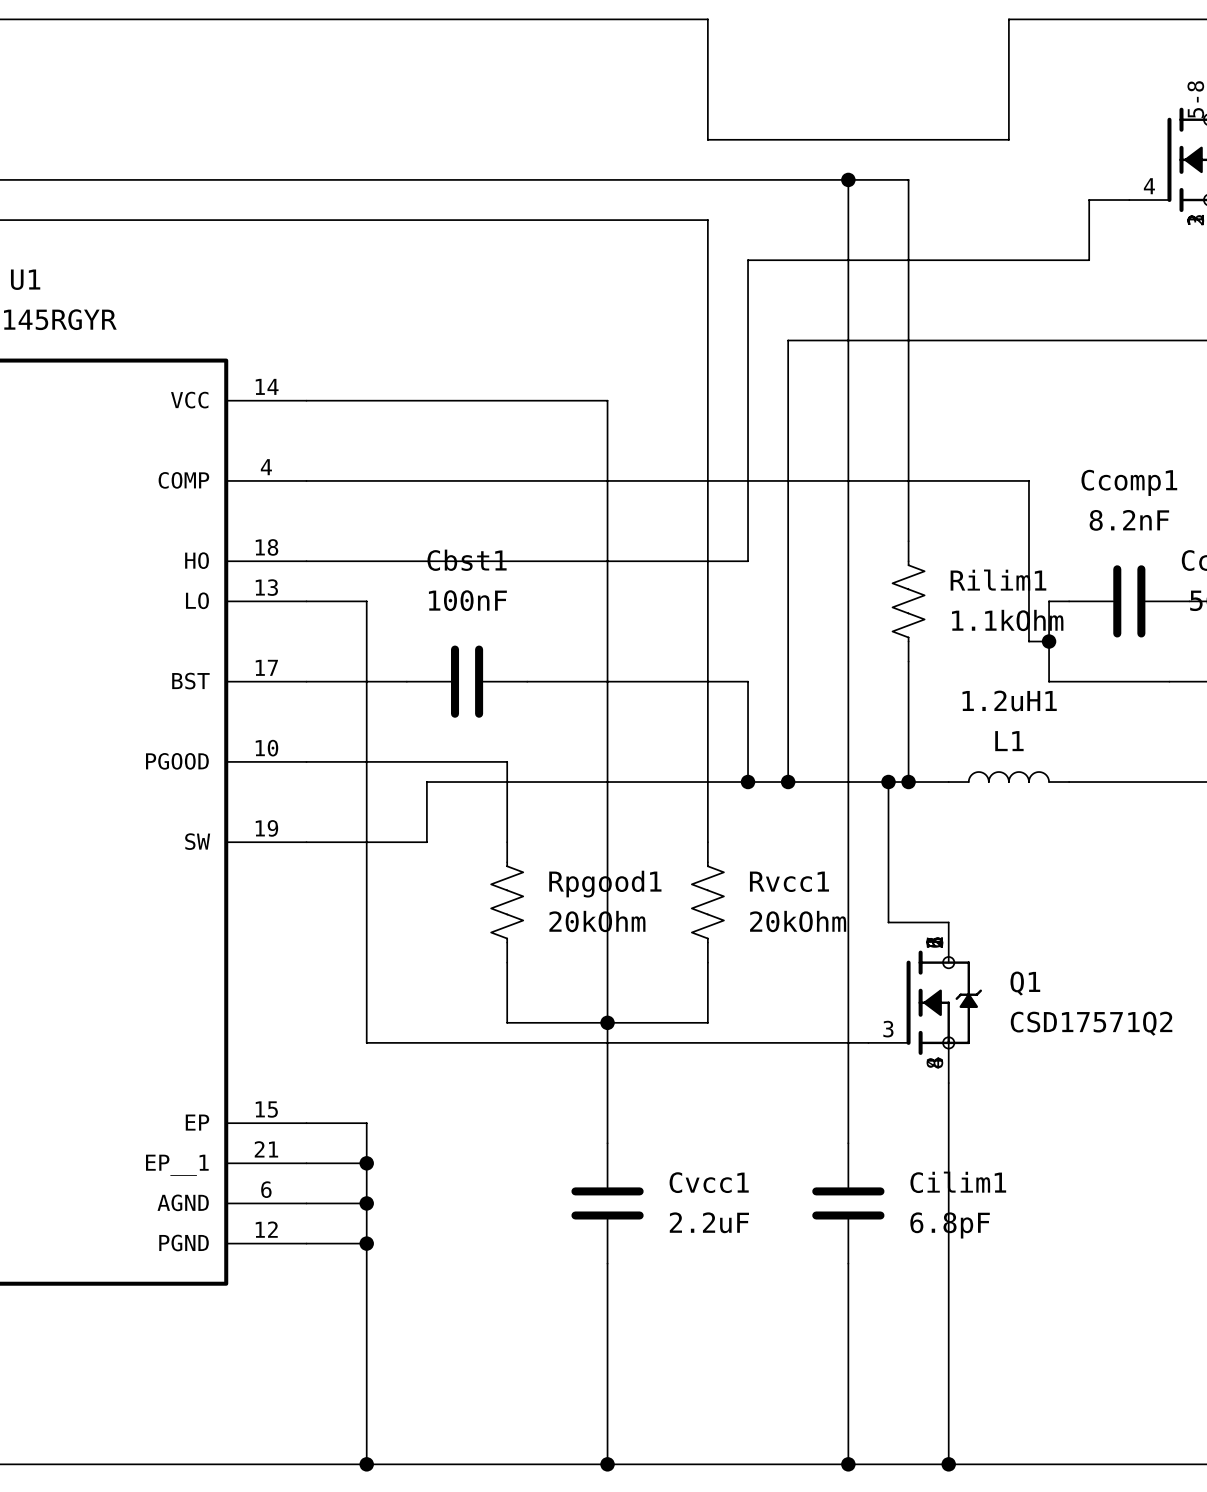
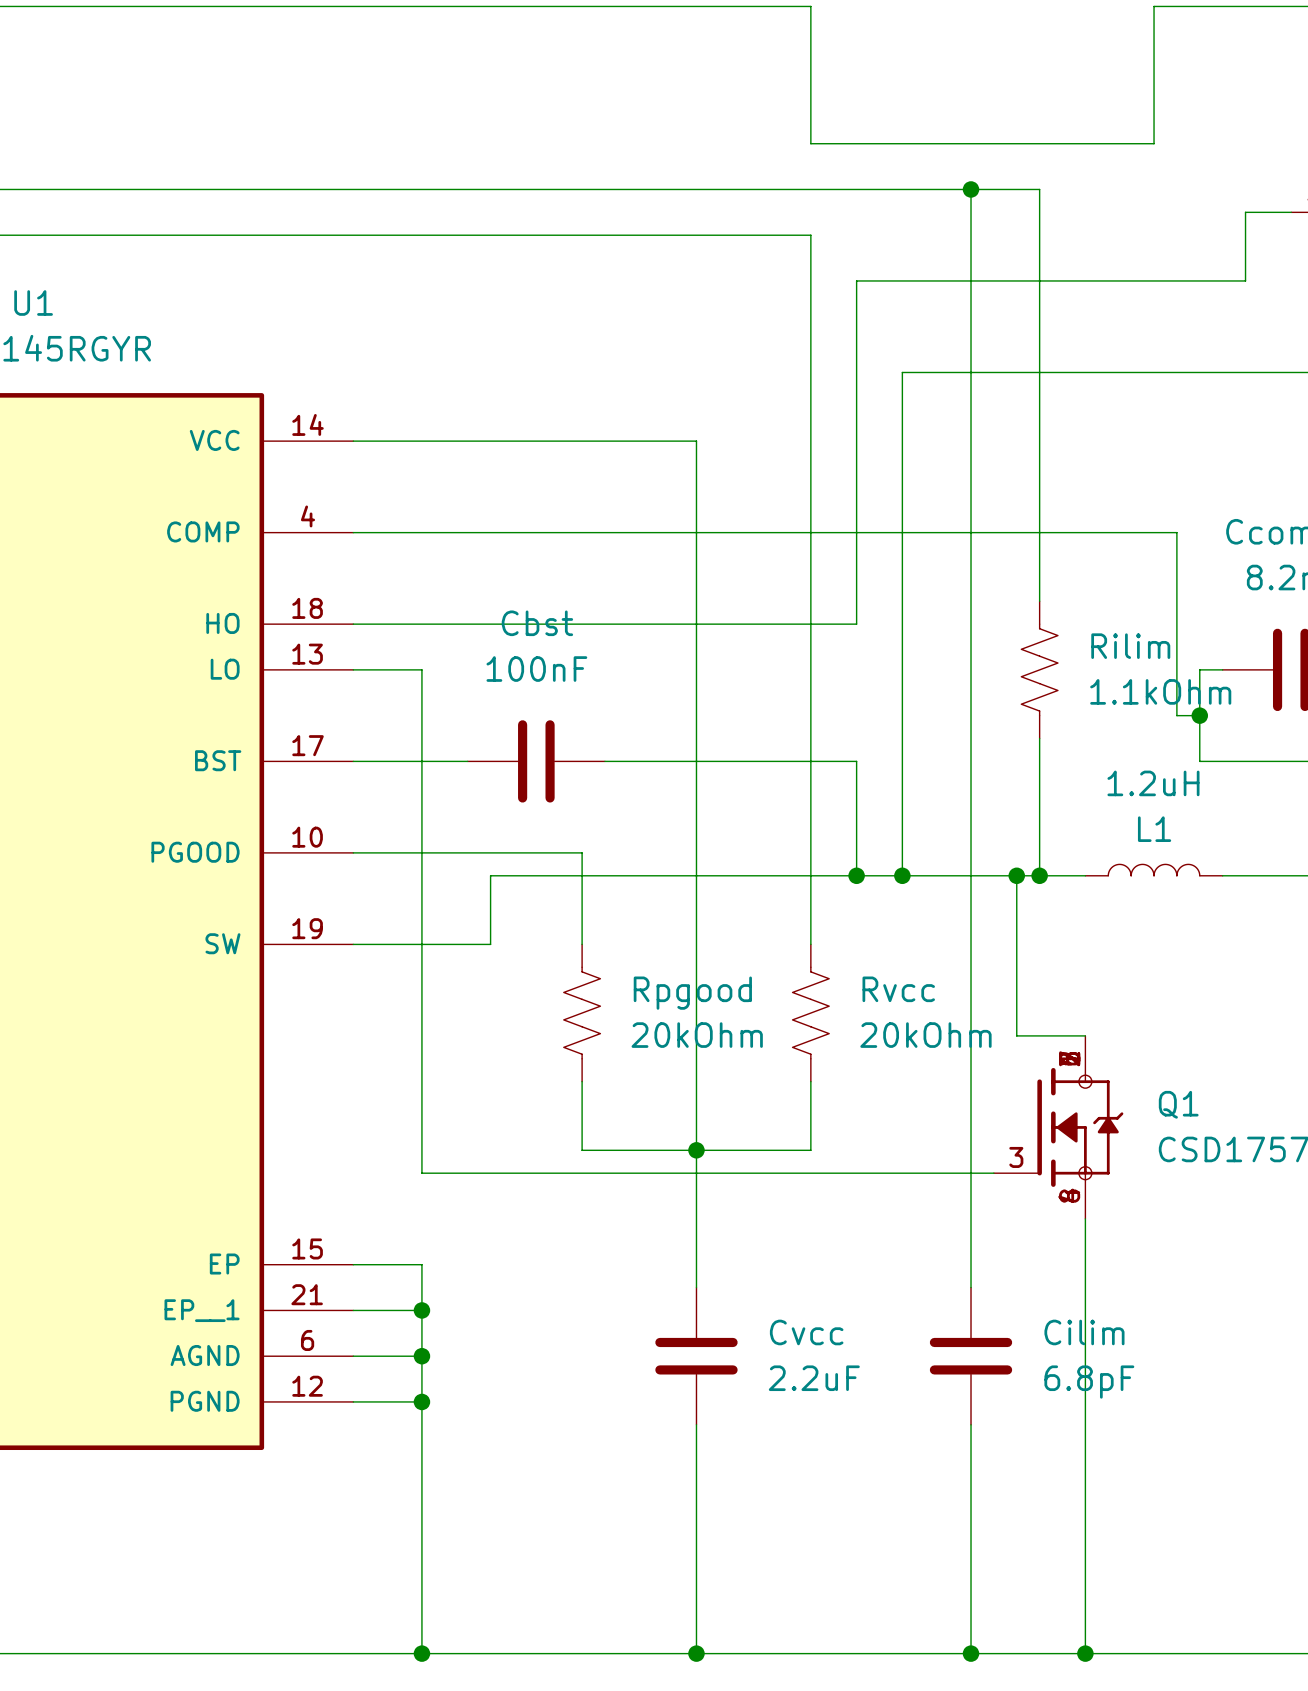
Cbst1 name: Cbst1 (467, 560) -> Cbst (537, 623)
Rilim1 name: Rilim1 (998, 580) -> Rilim (1130, 646)
1.2uH1 name: 1.2uH1 (1009, 700) -> 1.2uH (1153, 783)
Rvcc1 name: Rvcc1 (789, 881) -> Rvcc (898, 989)
Rpgood1 name: Rpgood1 (605, 884) -> Rpgood (692, 993)
Cvcc1 name: Cvcc1 (709, 1182) -> Cvcc (806, 1332)
Cilim1 name: Cilim1 (958, 1182) -> Cilim (1084, 1332)

